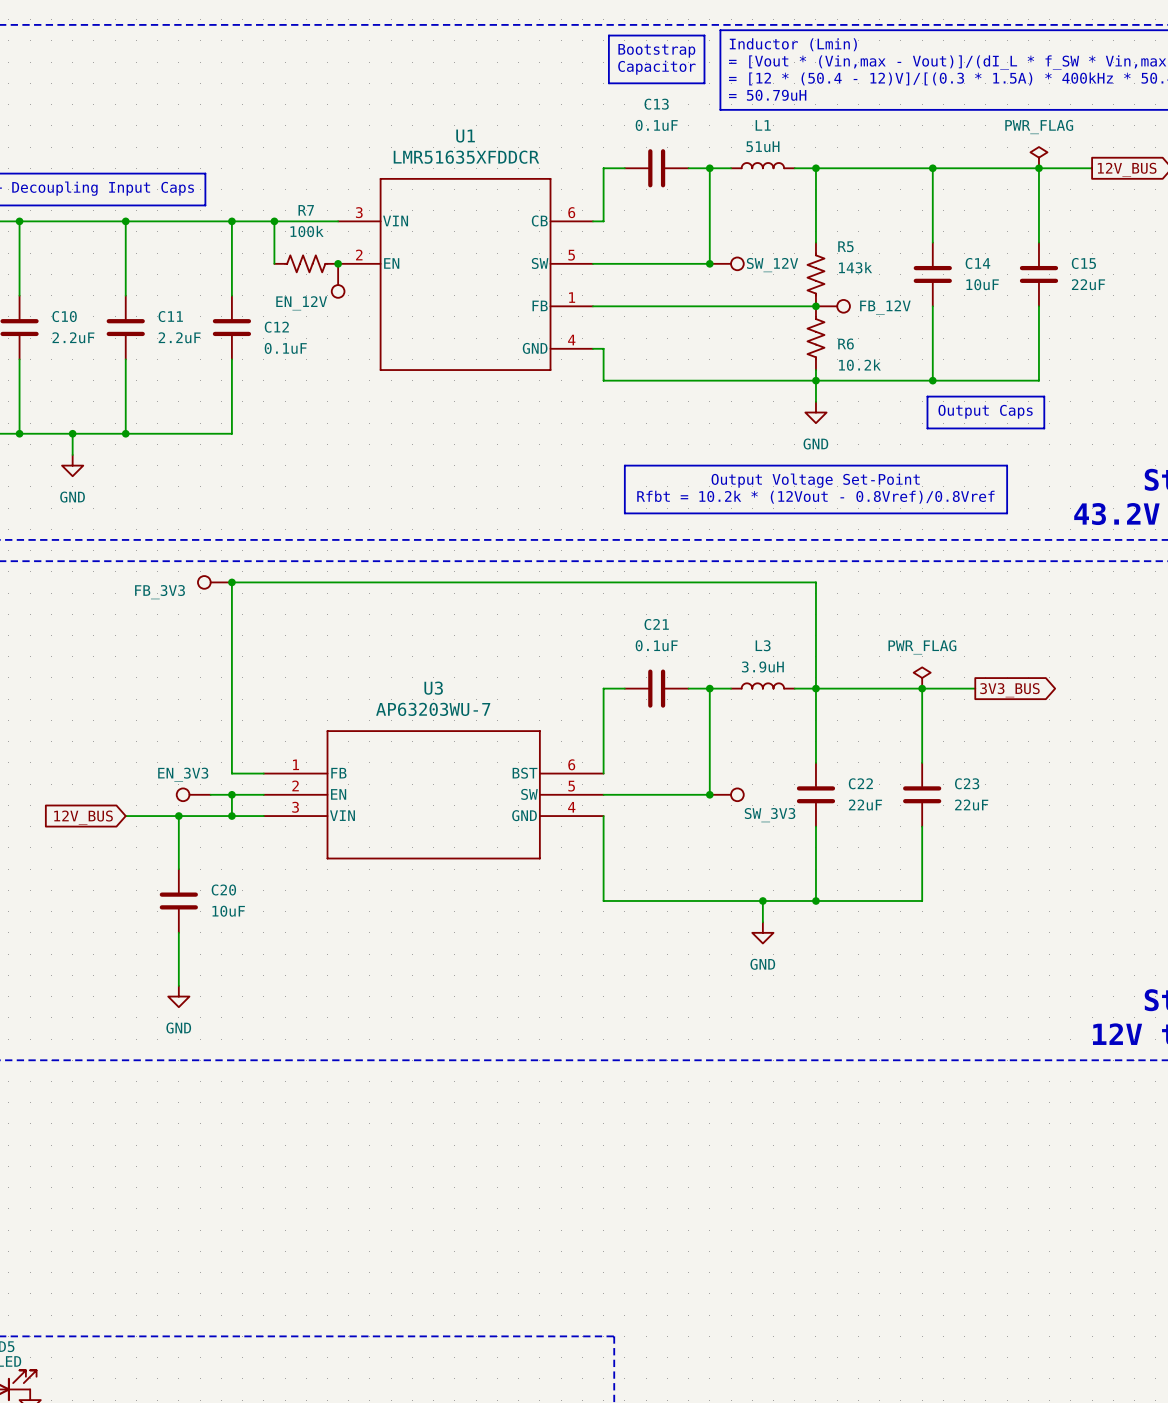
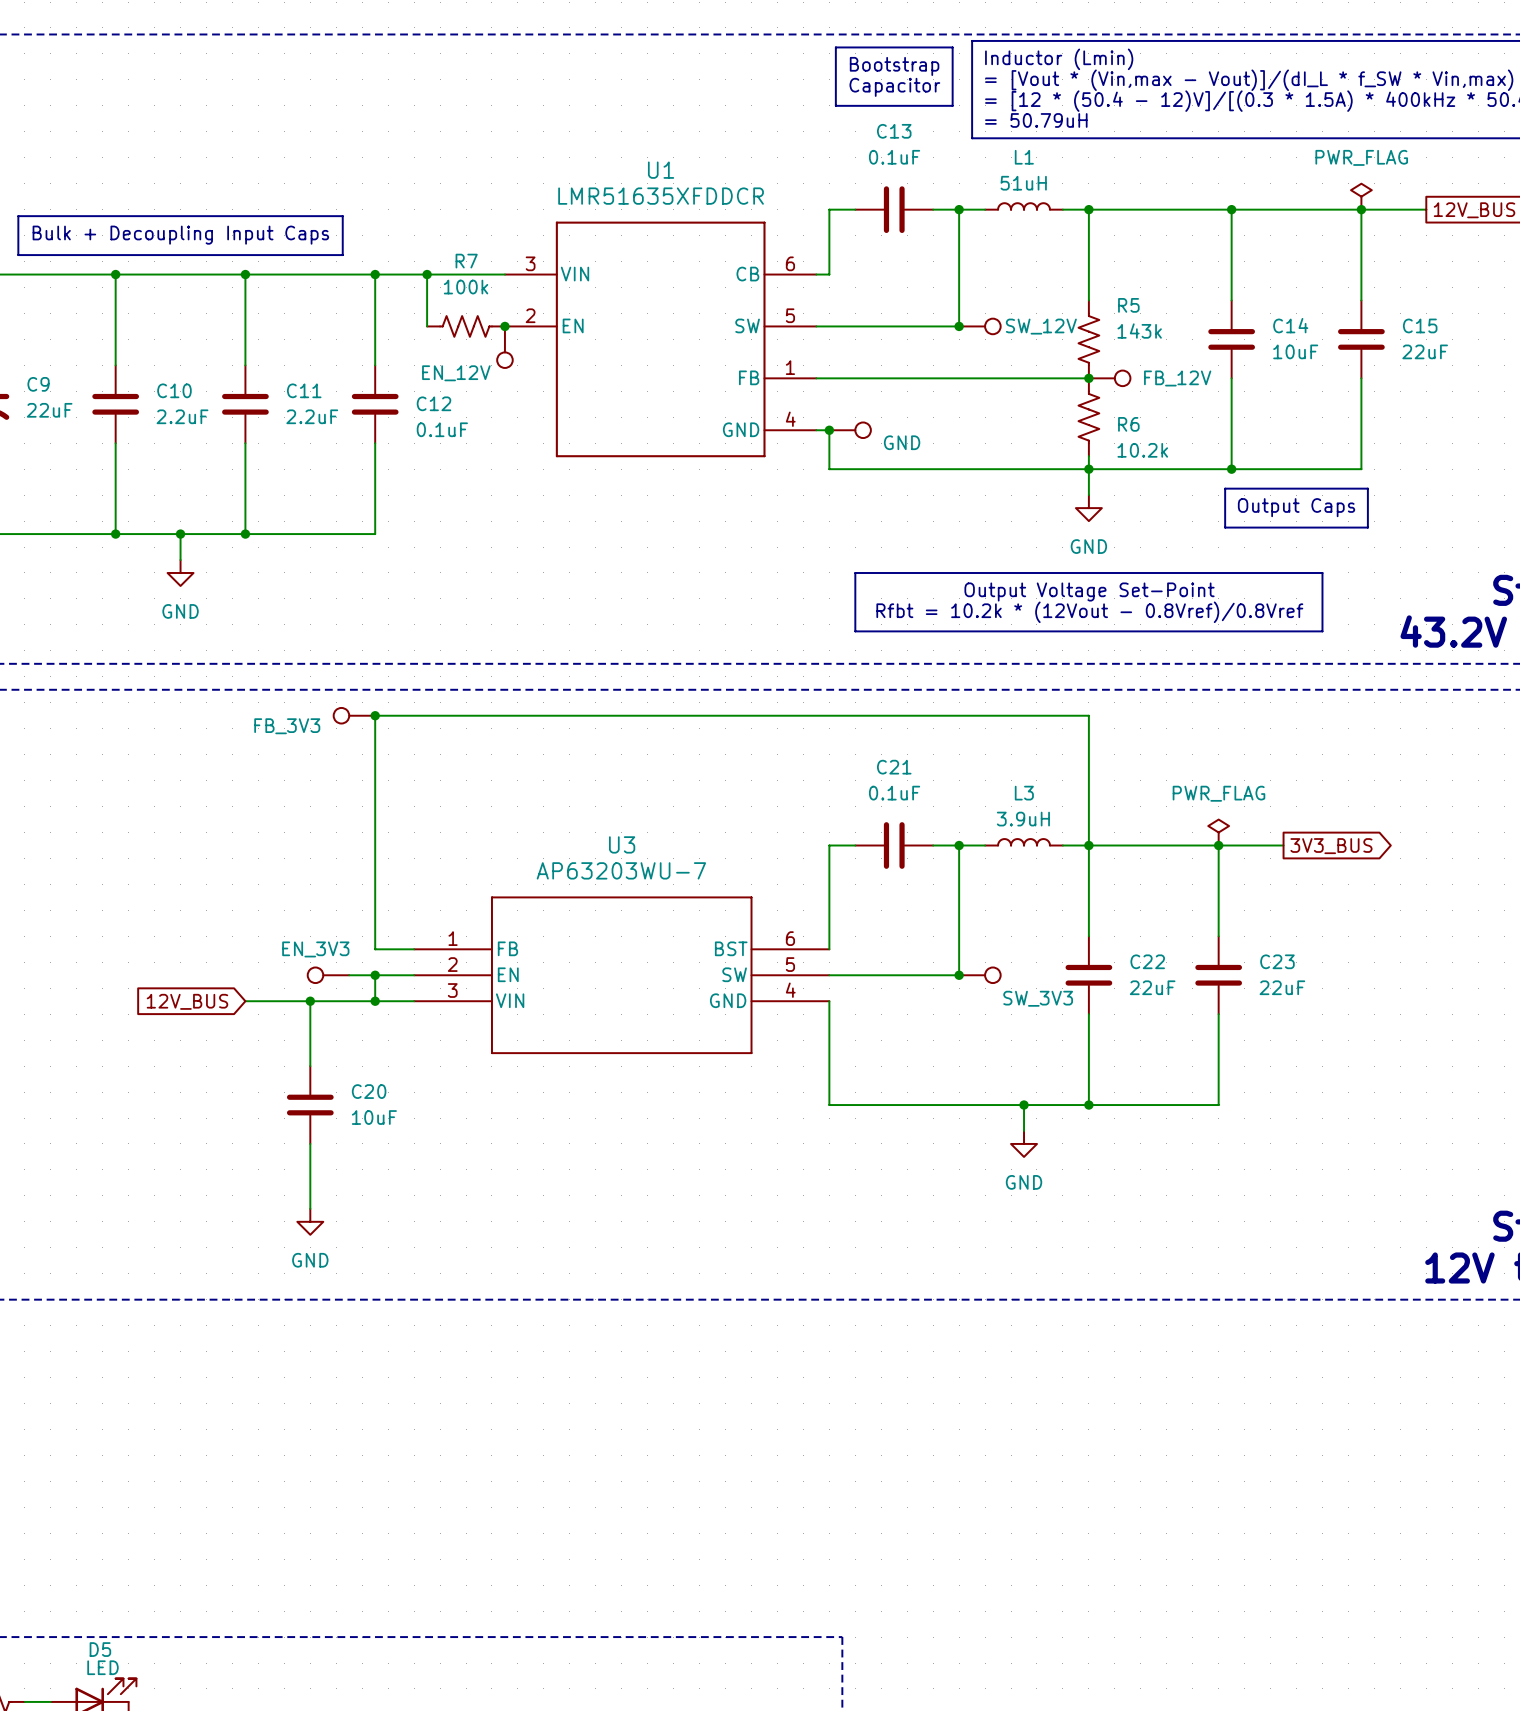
junction: none -> (829, 430)
part: none -> GND (850, 430)

